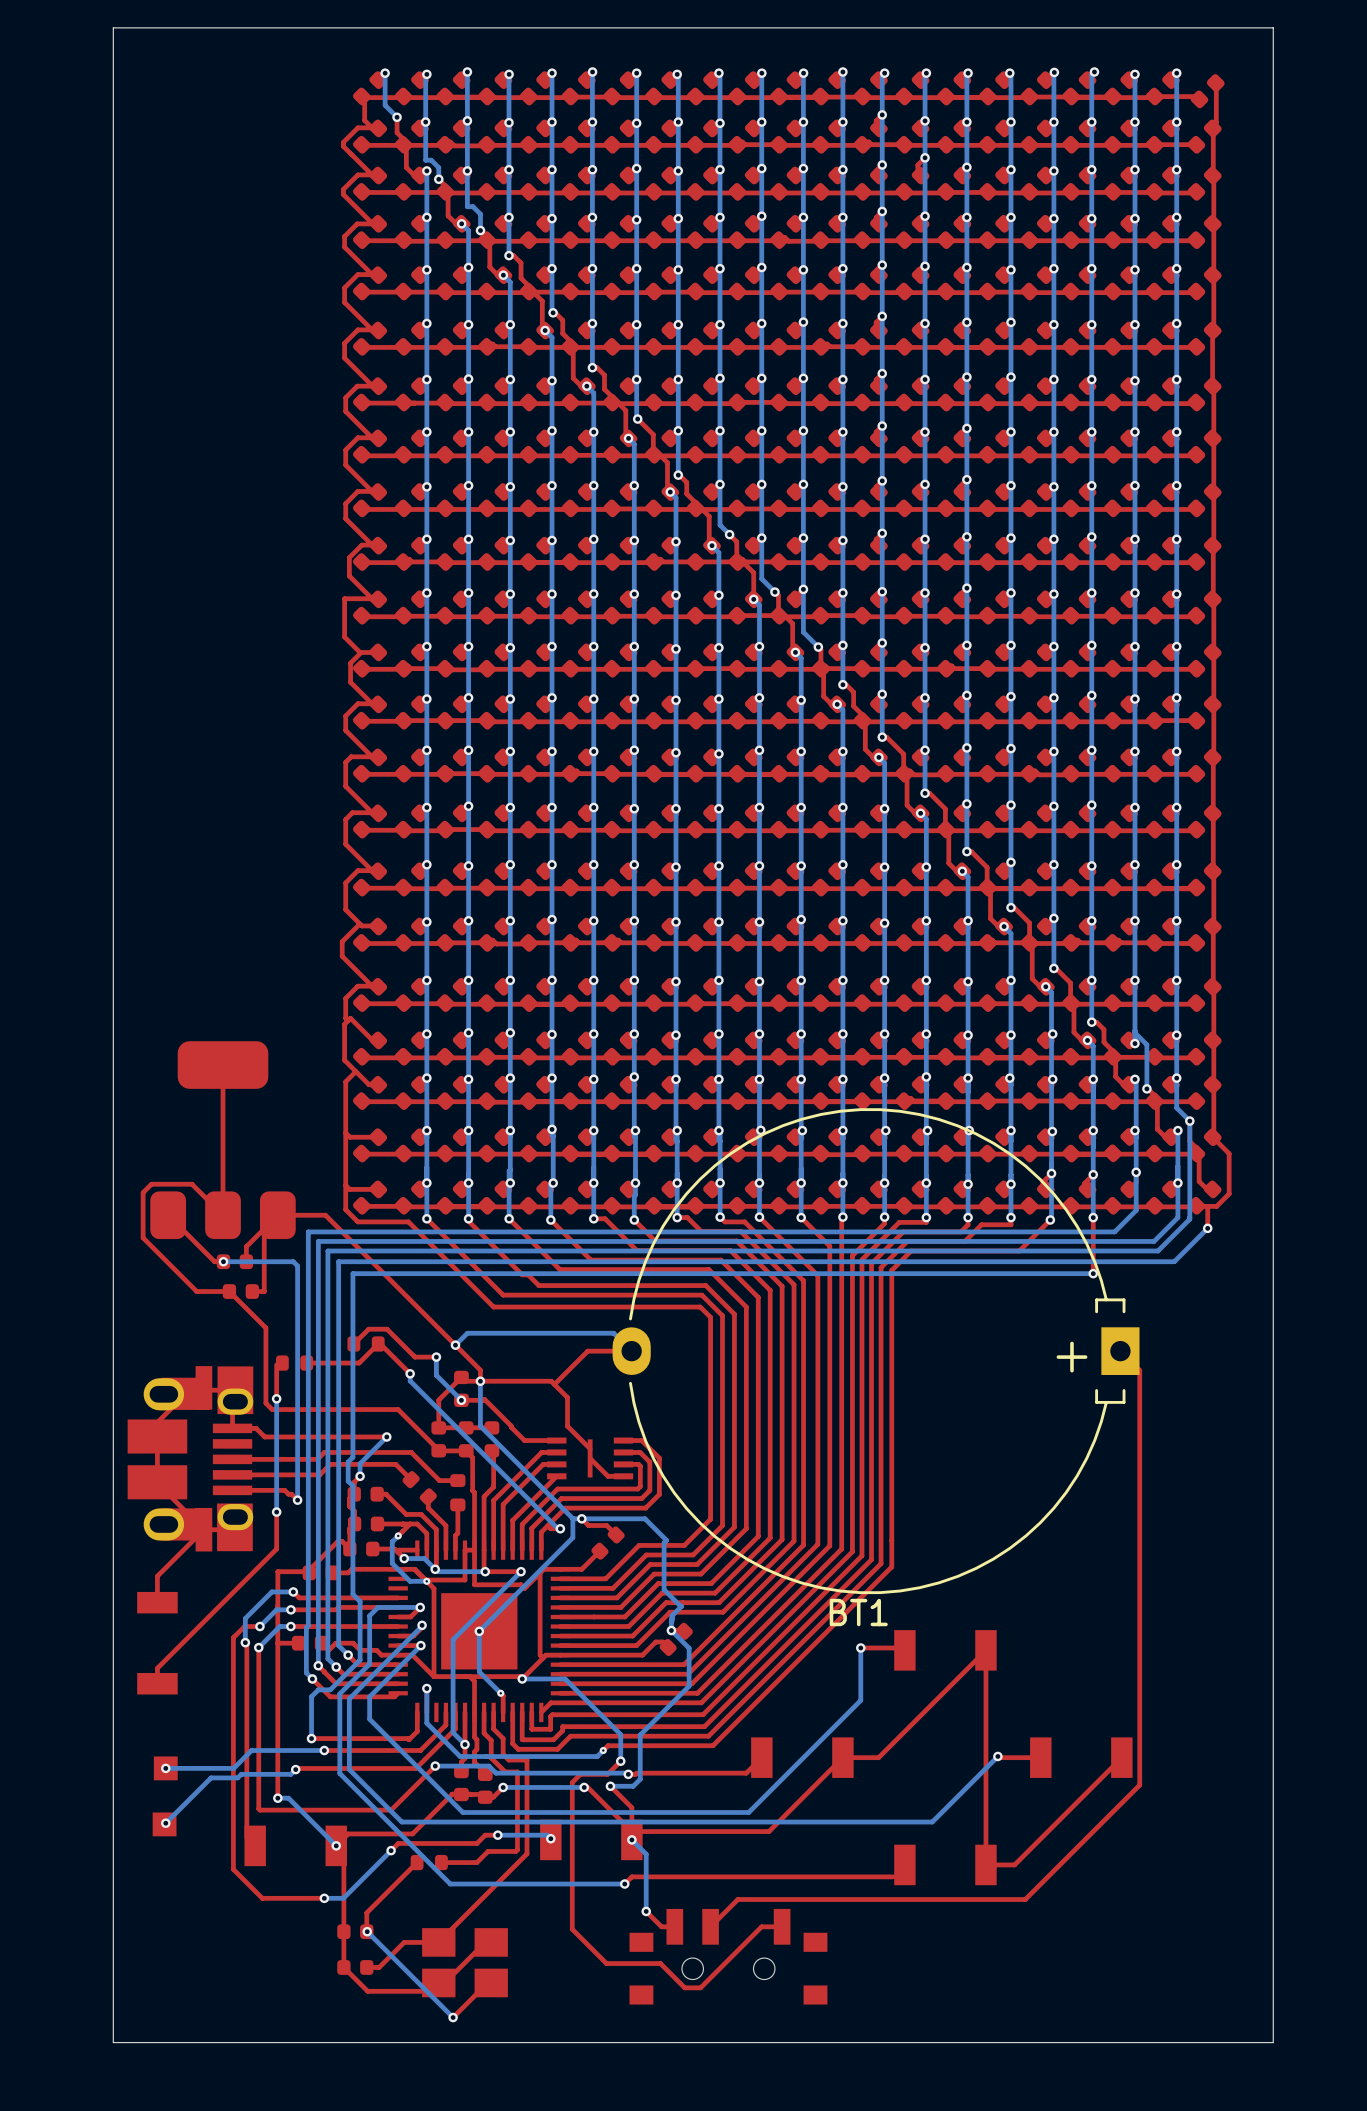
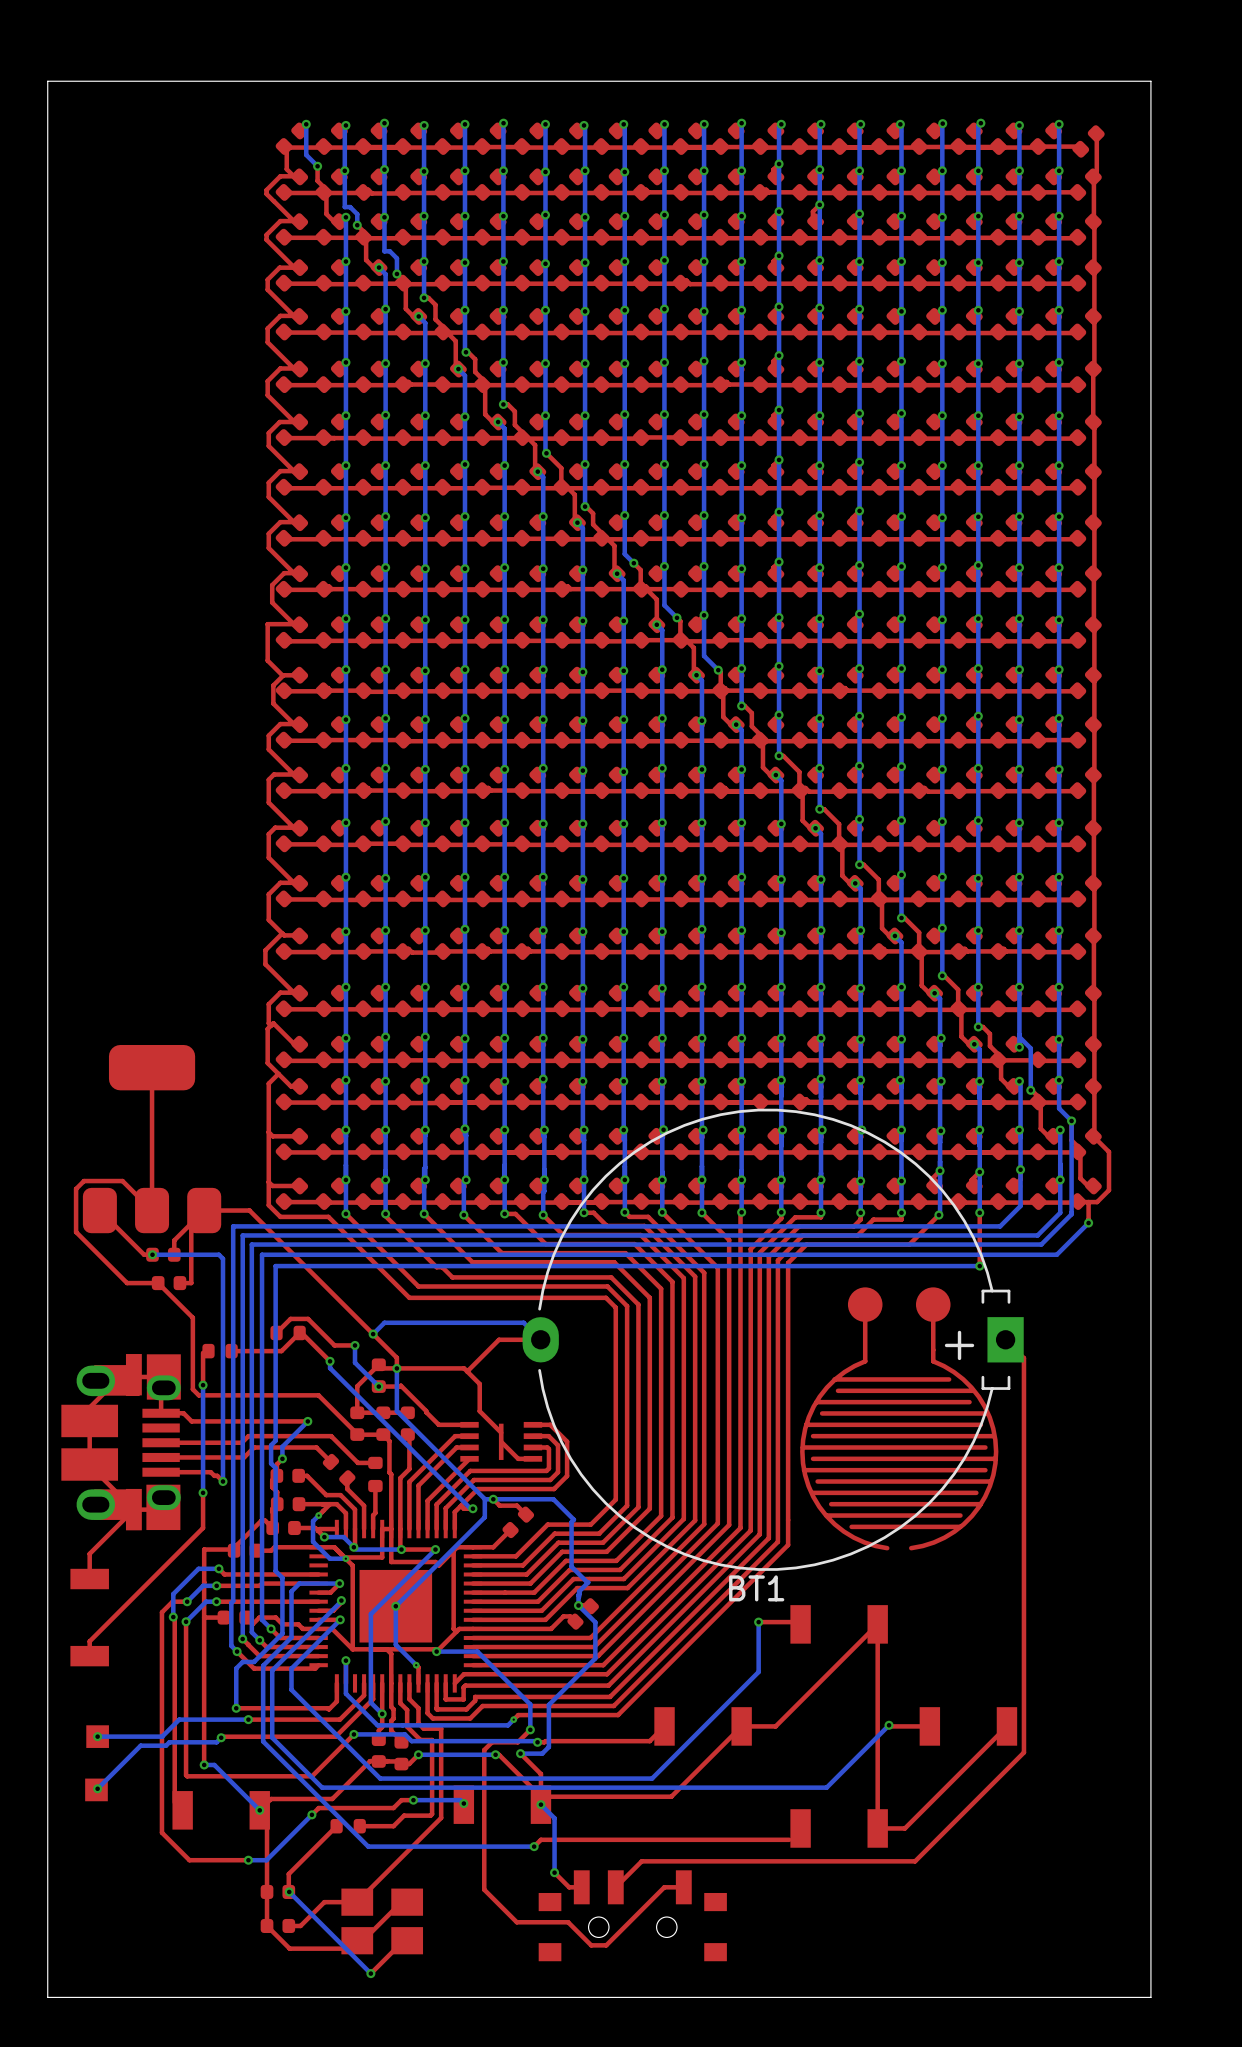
part: none -> (899, 1418)

